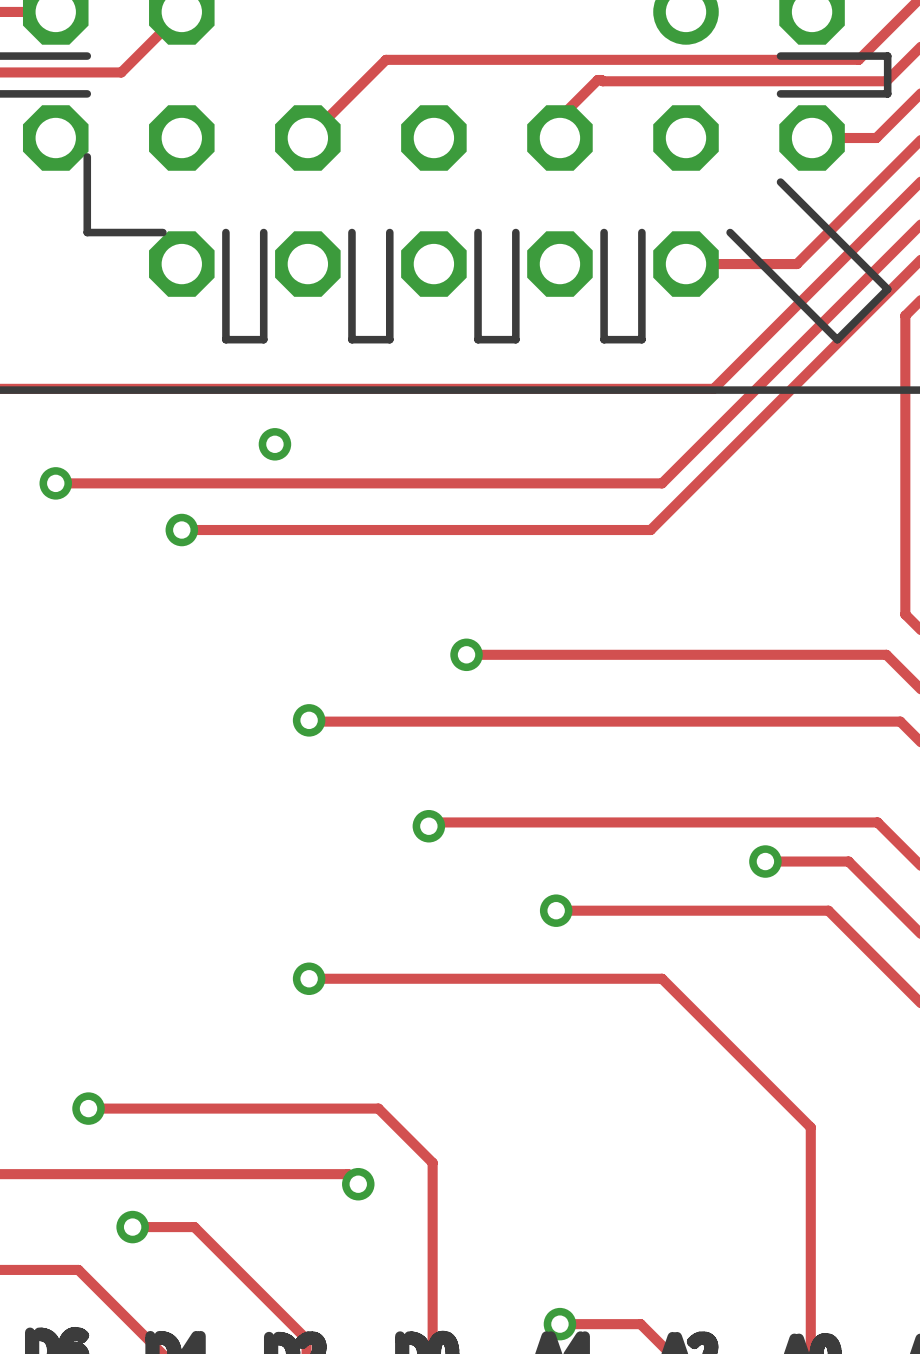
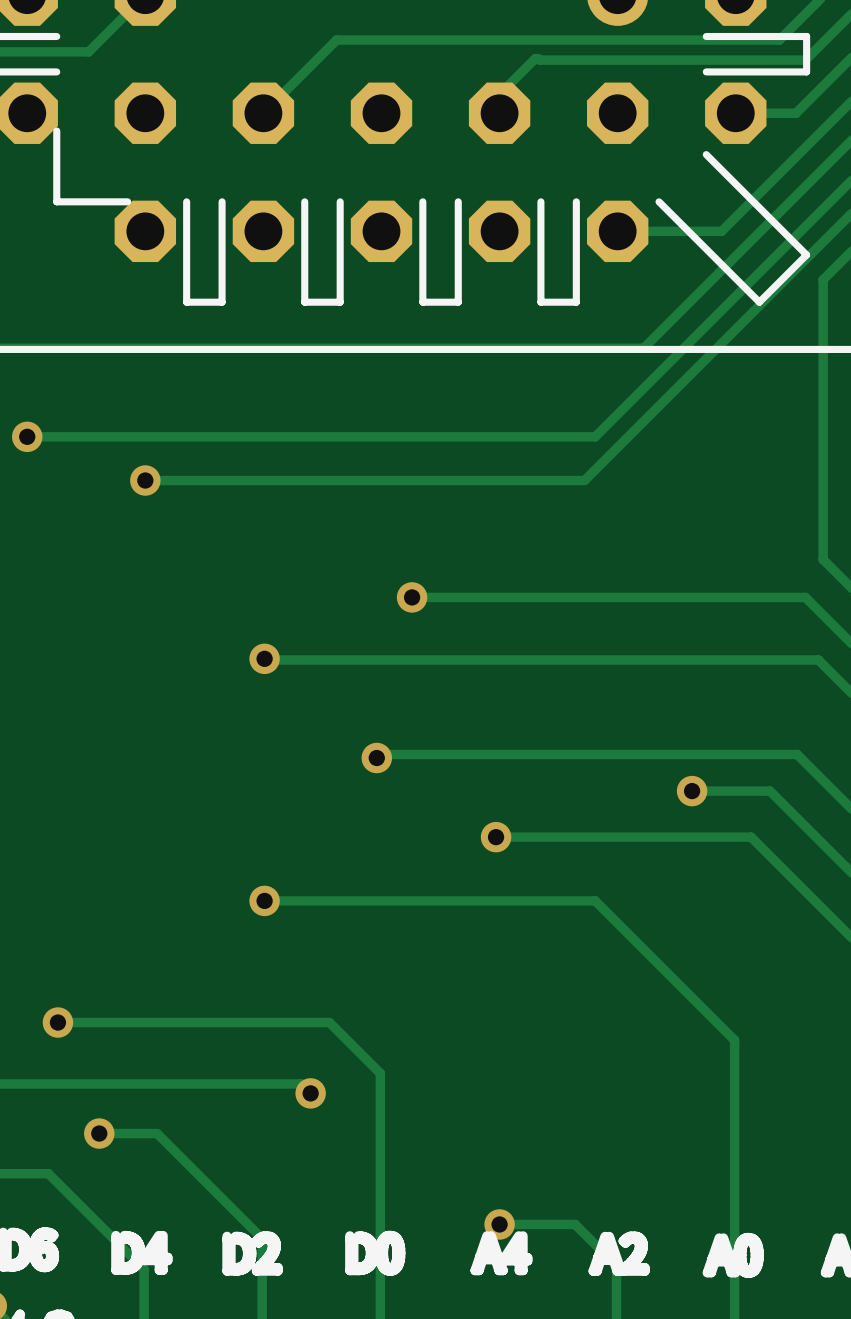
via: (274, 444) -> none

